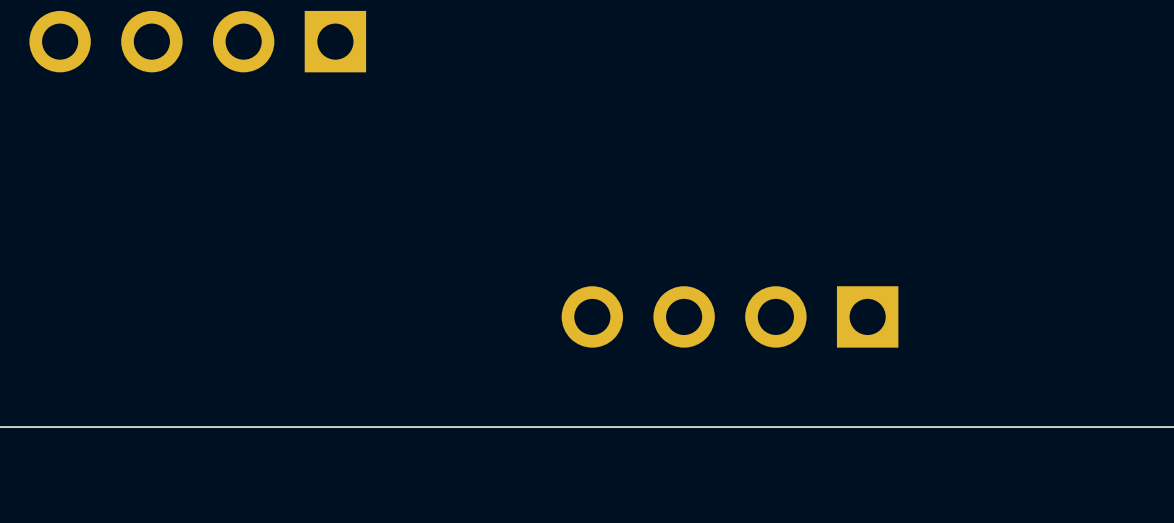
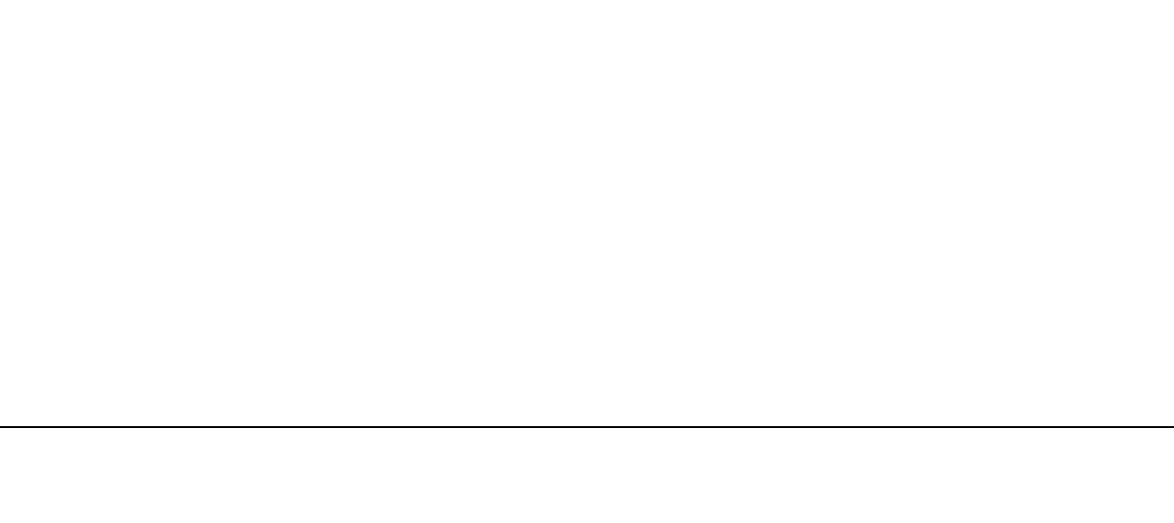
part: (197, 41) -> none
part: (730, 316) -> none

